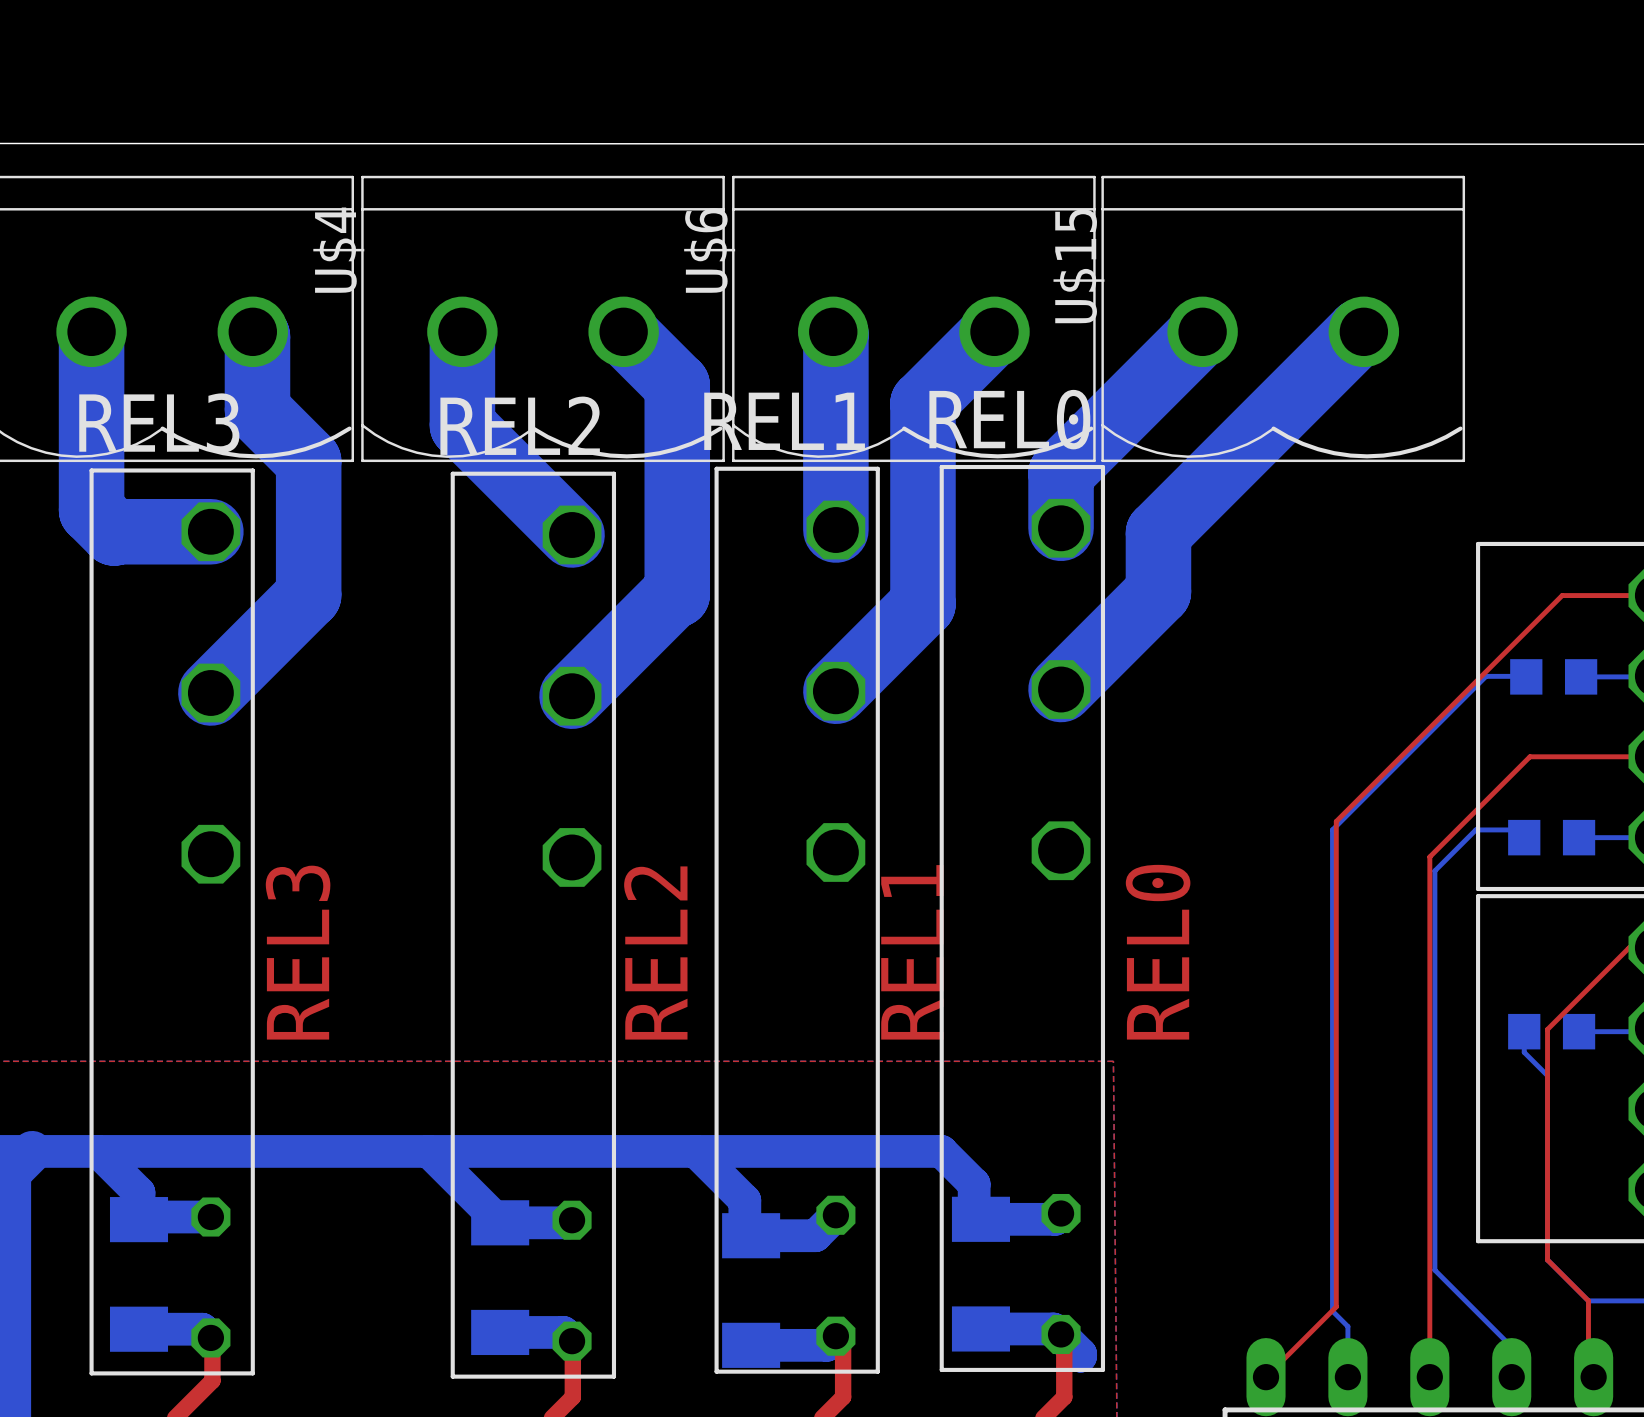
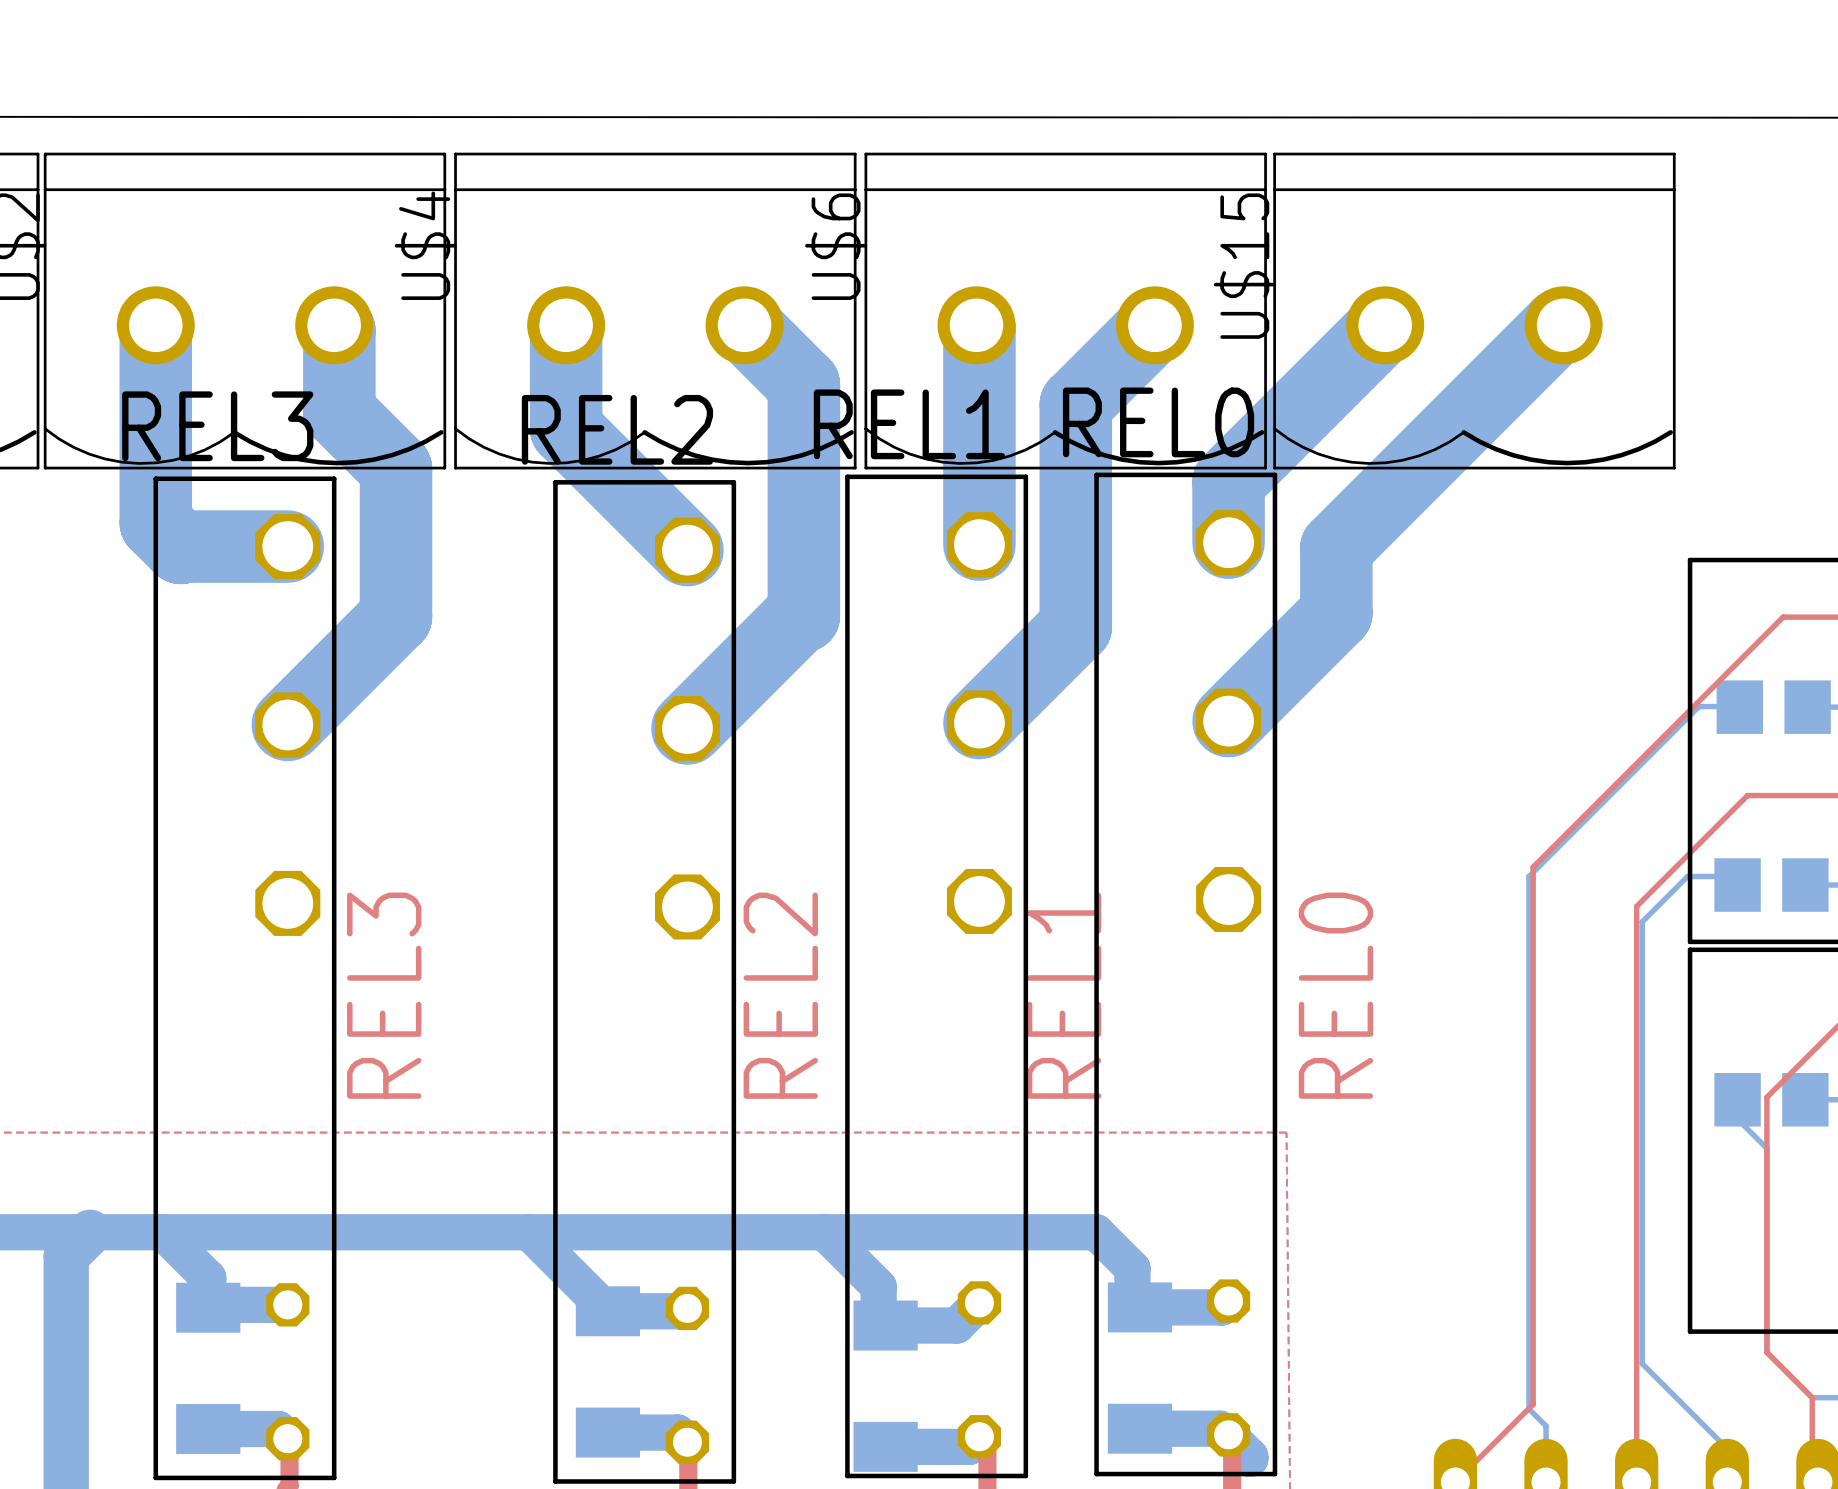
part footprint: [1510, 659, 1598, 695] -> [1716, 680, 1831, 734]
part footprint: [1508, 819, 1596, 856] -> [1714, 858, 1829, 912]
part footprint: [1508, 1013, 1596, 1050] -> [1714, 1072, 1829, 1127]

